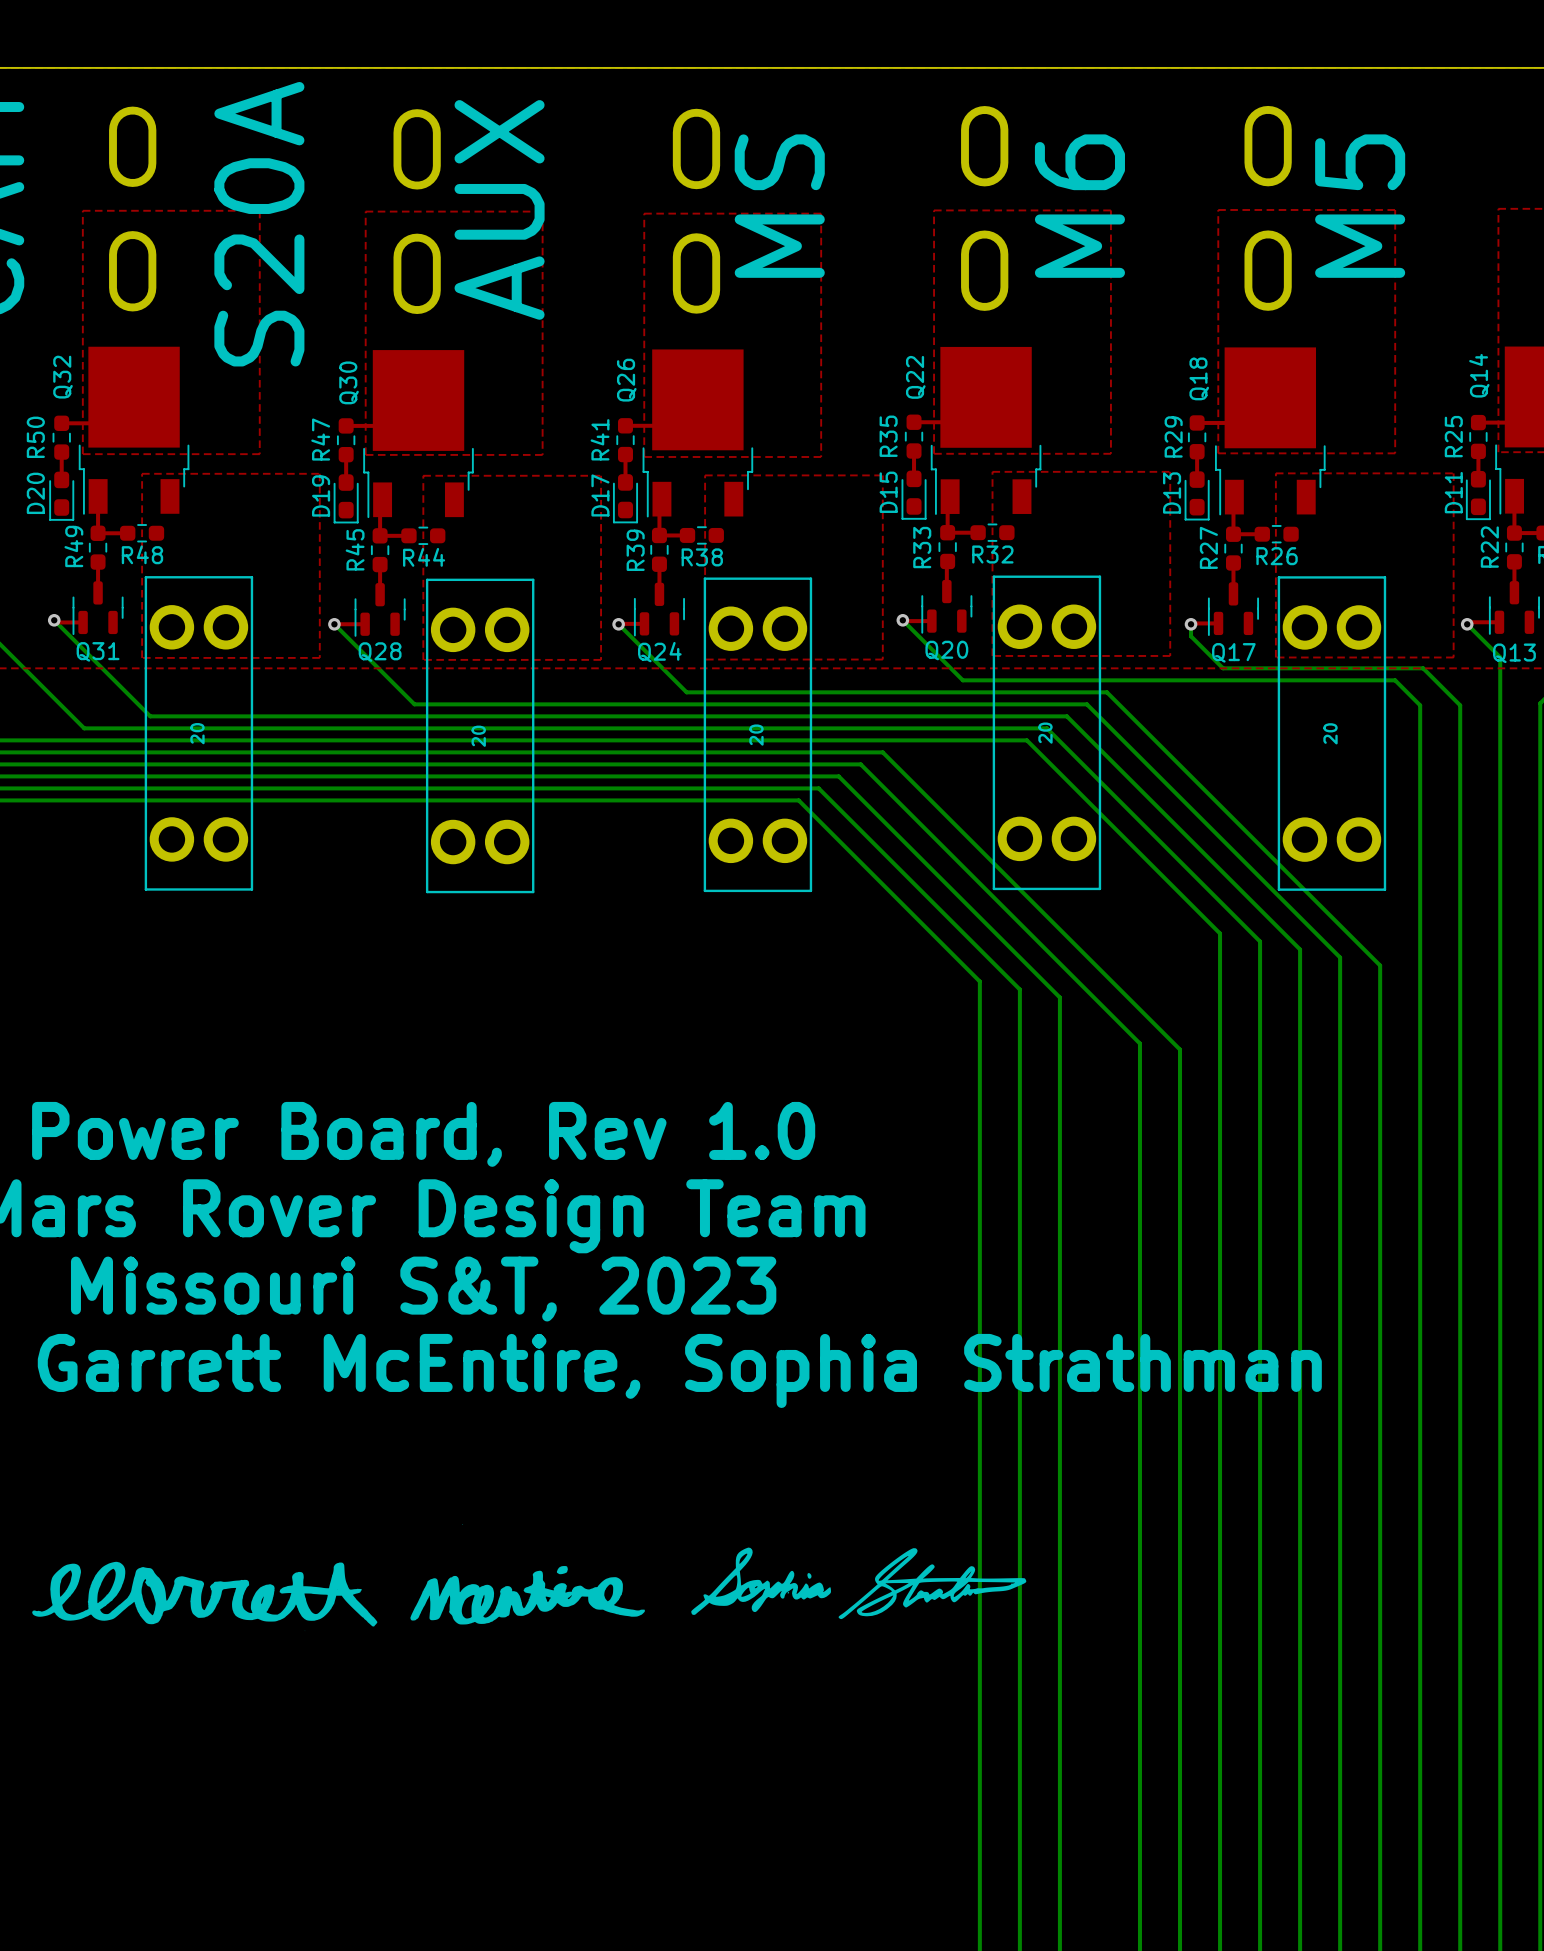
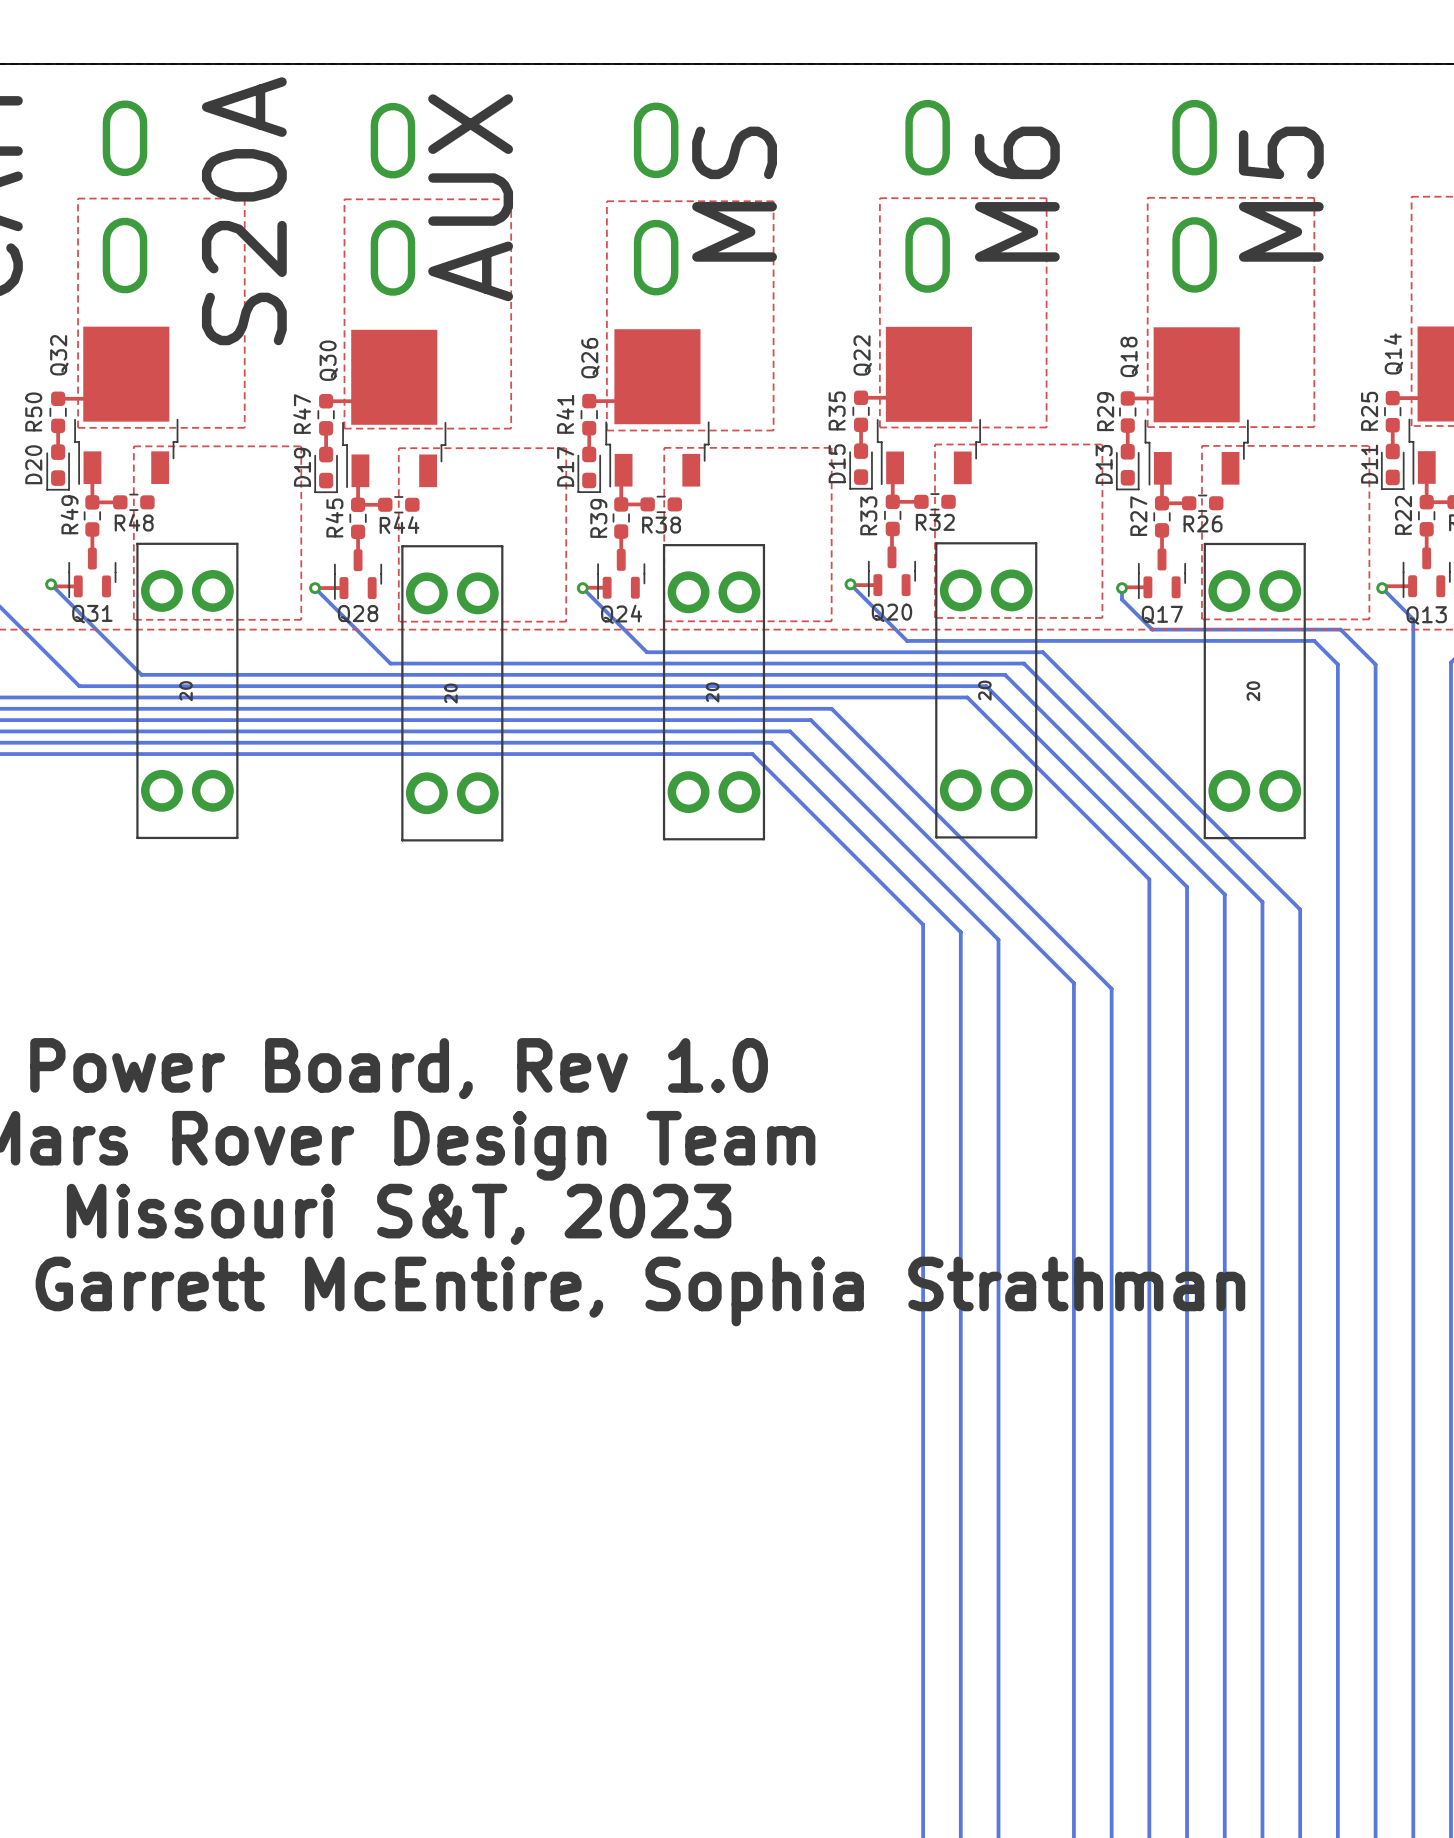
drawing: [32, 1524, 645, 1632] -> none
drawing: [691, 1547, 1027, 1620] -> none

